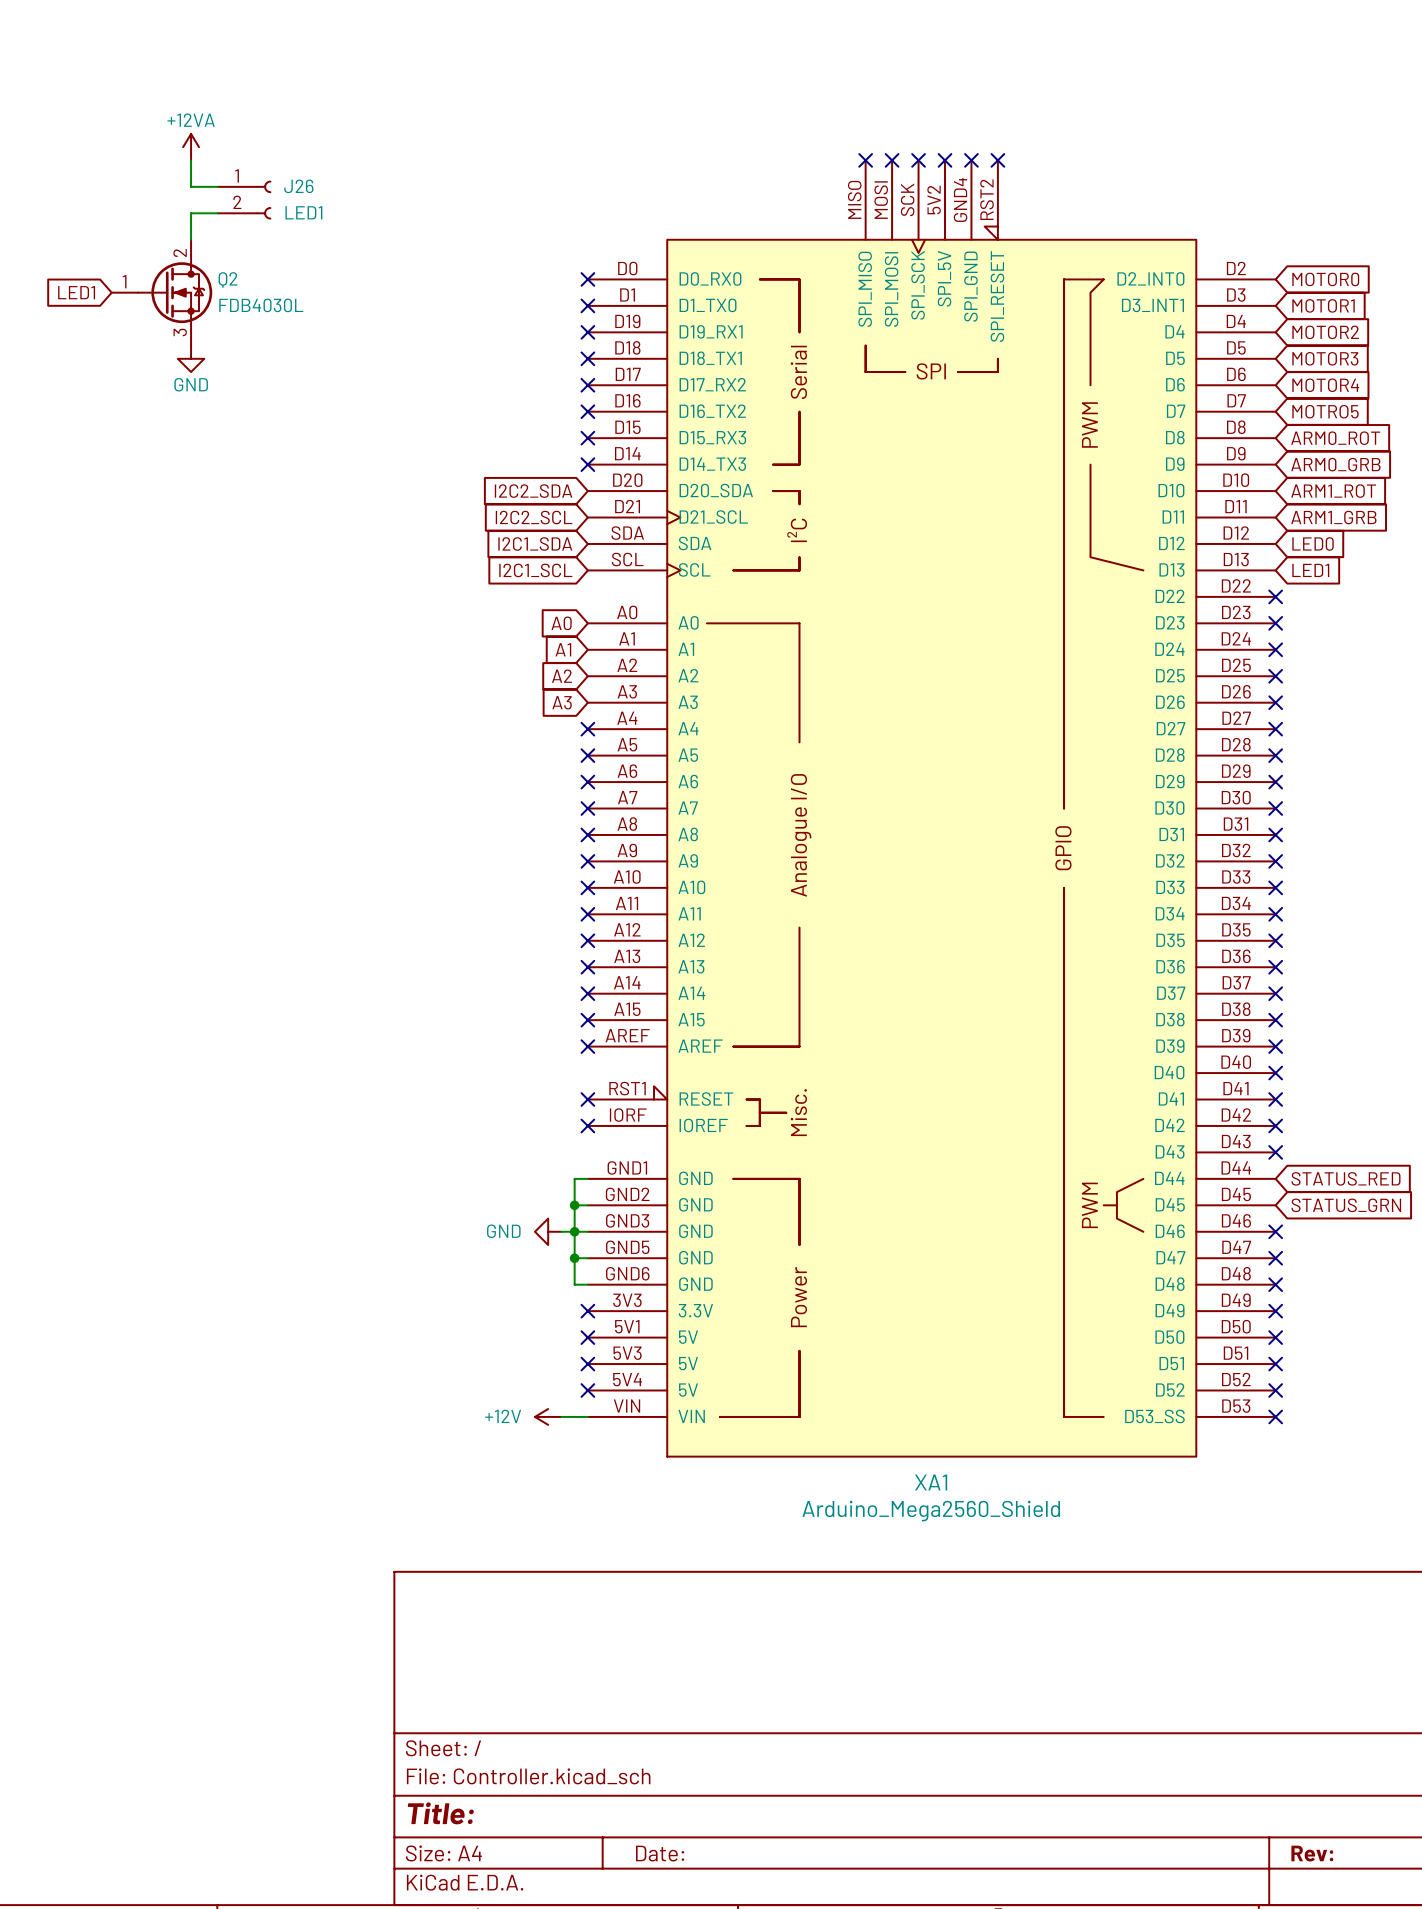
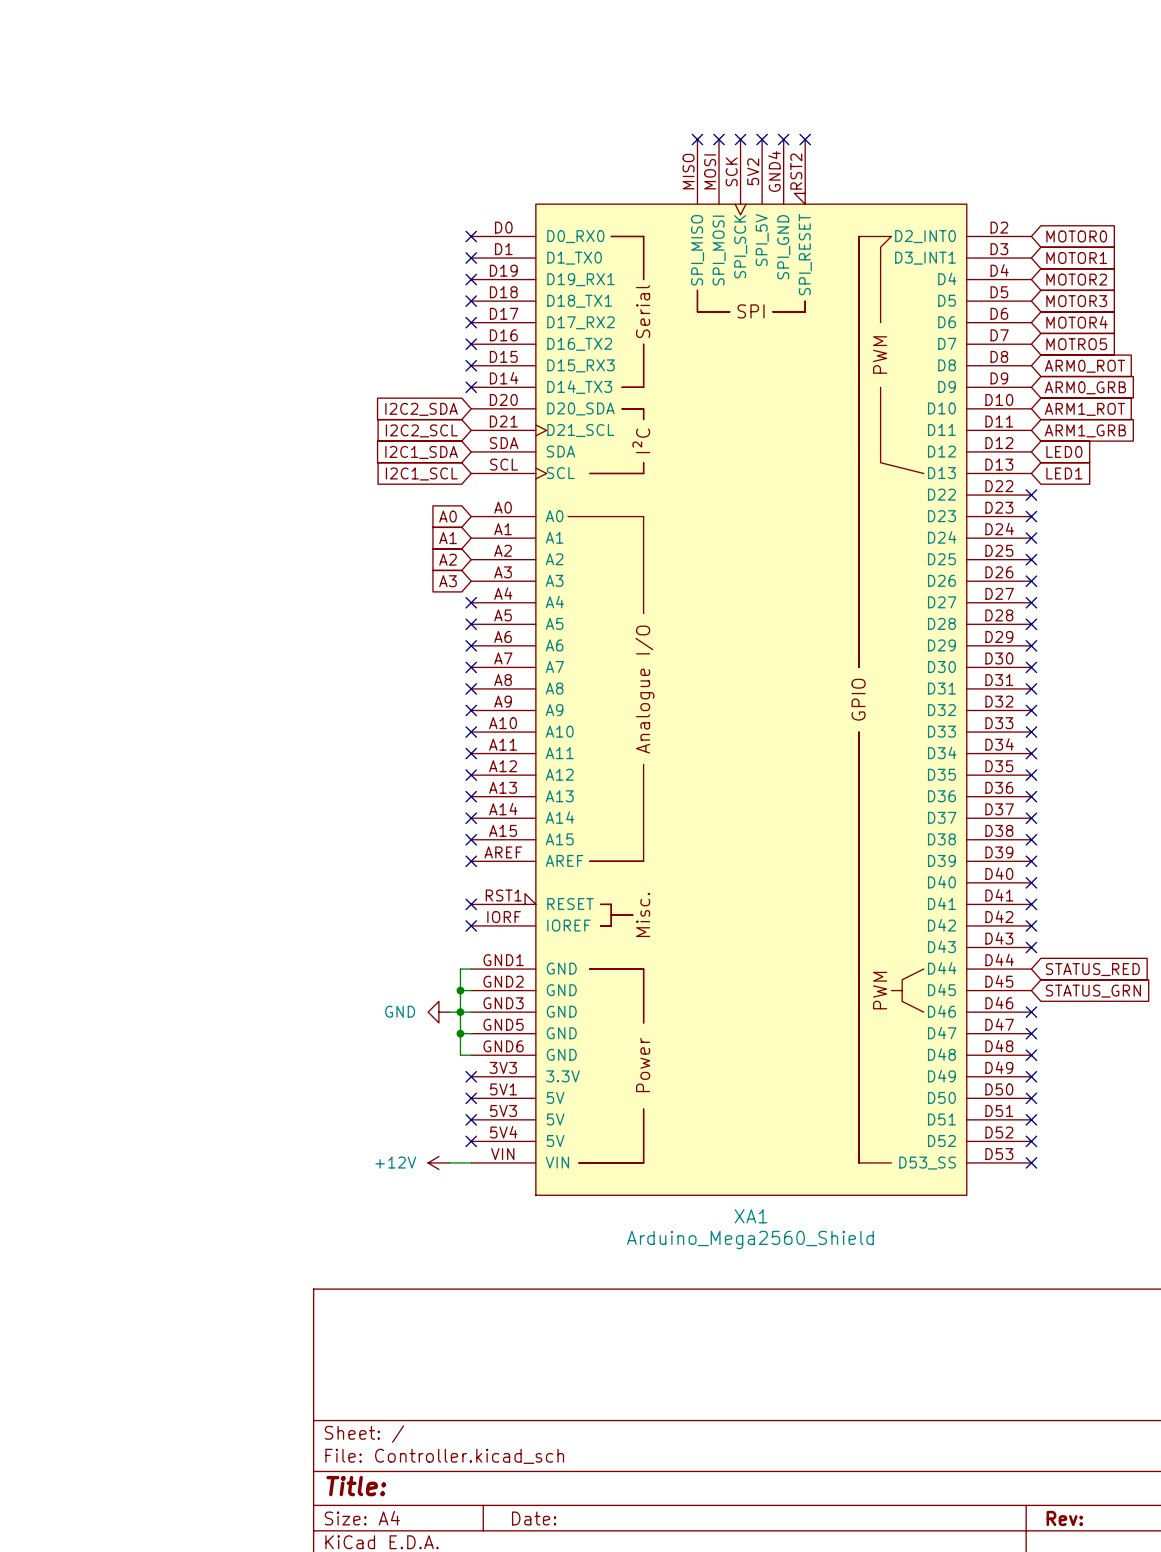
power symbol: +12VA (191, 147) -> none
wire: (191, 160) (191, 186) (217, 186) -> none
J26: LED1 (244, 200) -> none
wire: (217, 213) (191, 213) (191, 239) -> none
global label: LED1 (76, 292) -> none
Q2: FDB4030L (161, 292) -> none
power symbol: GND (191, 358) -> none

